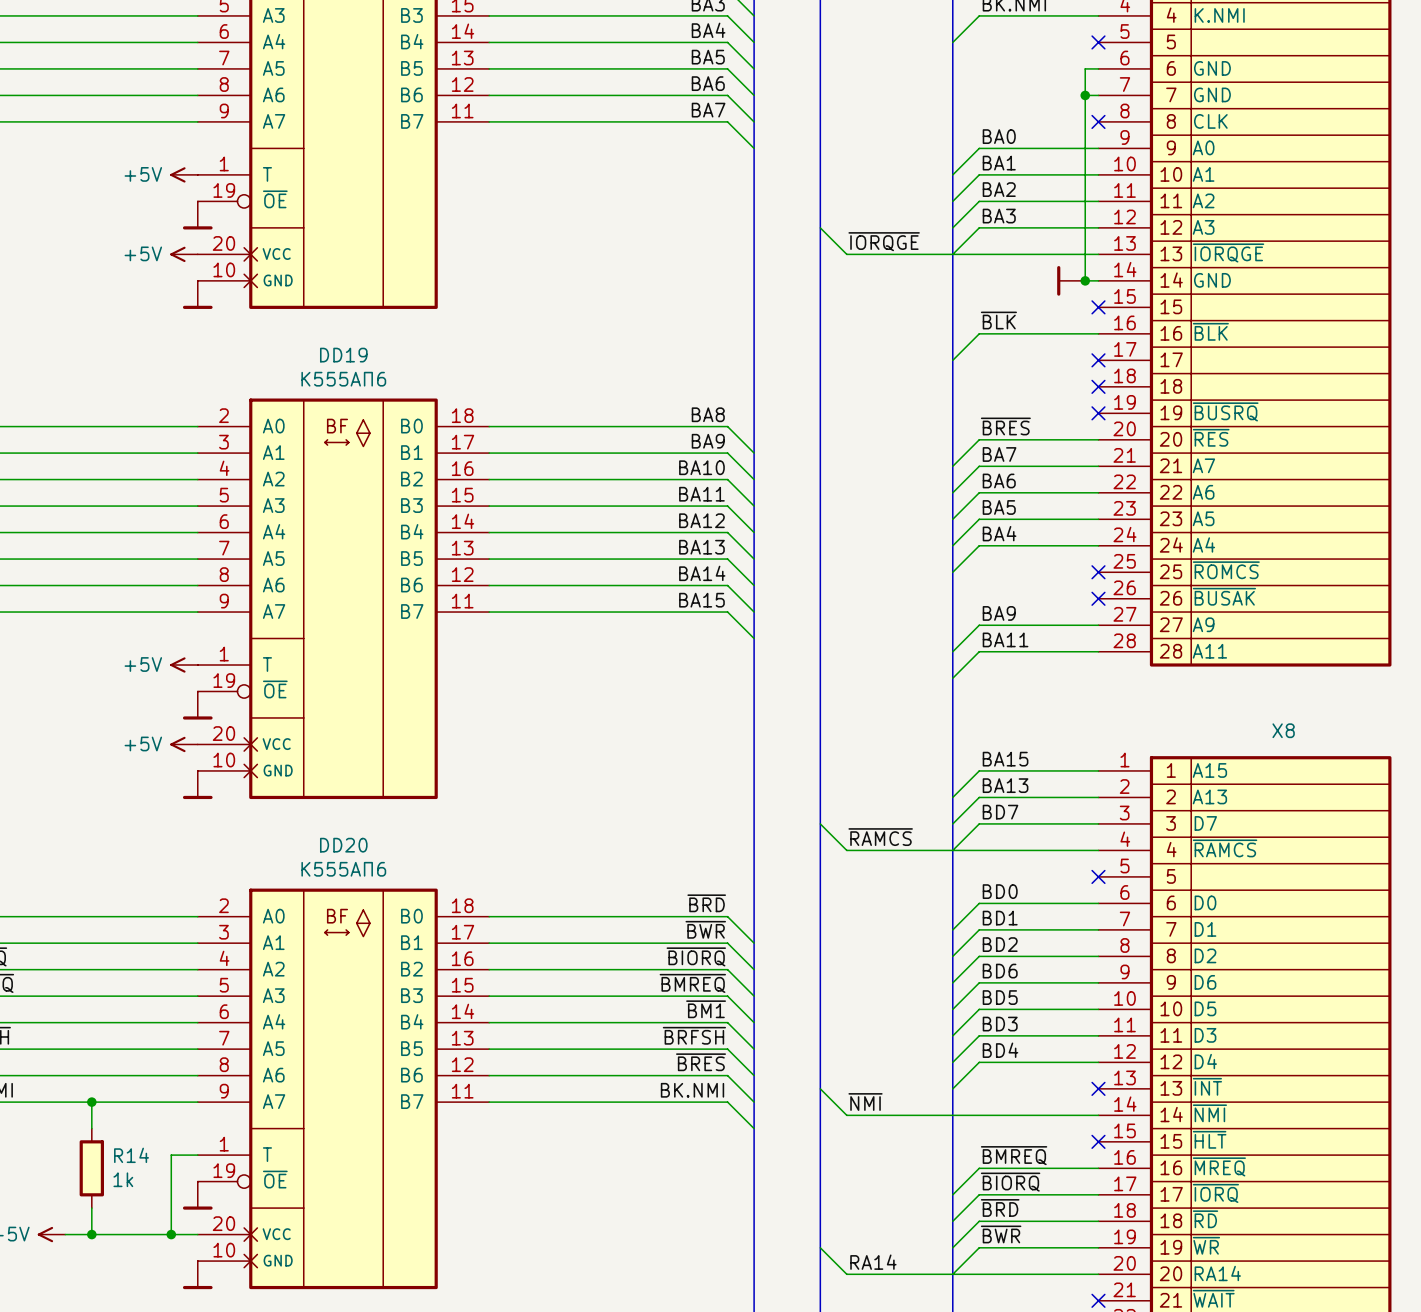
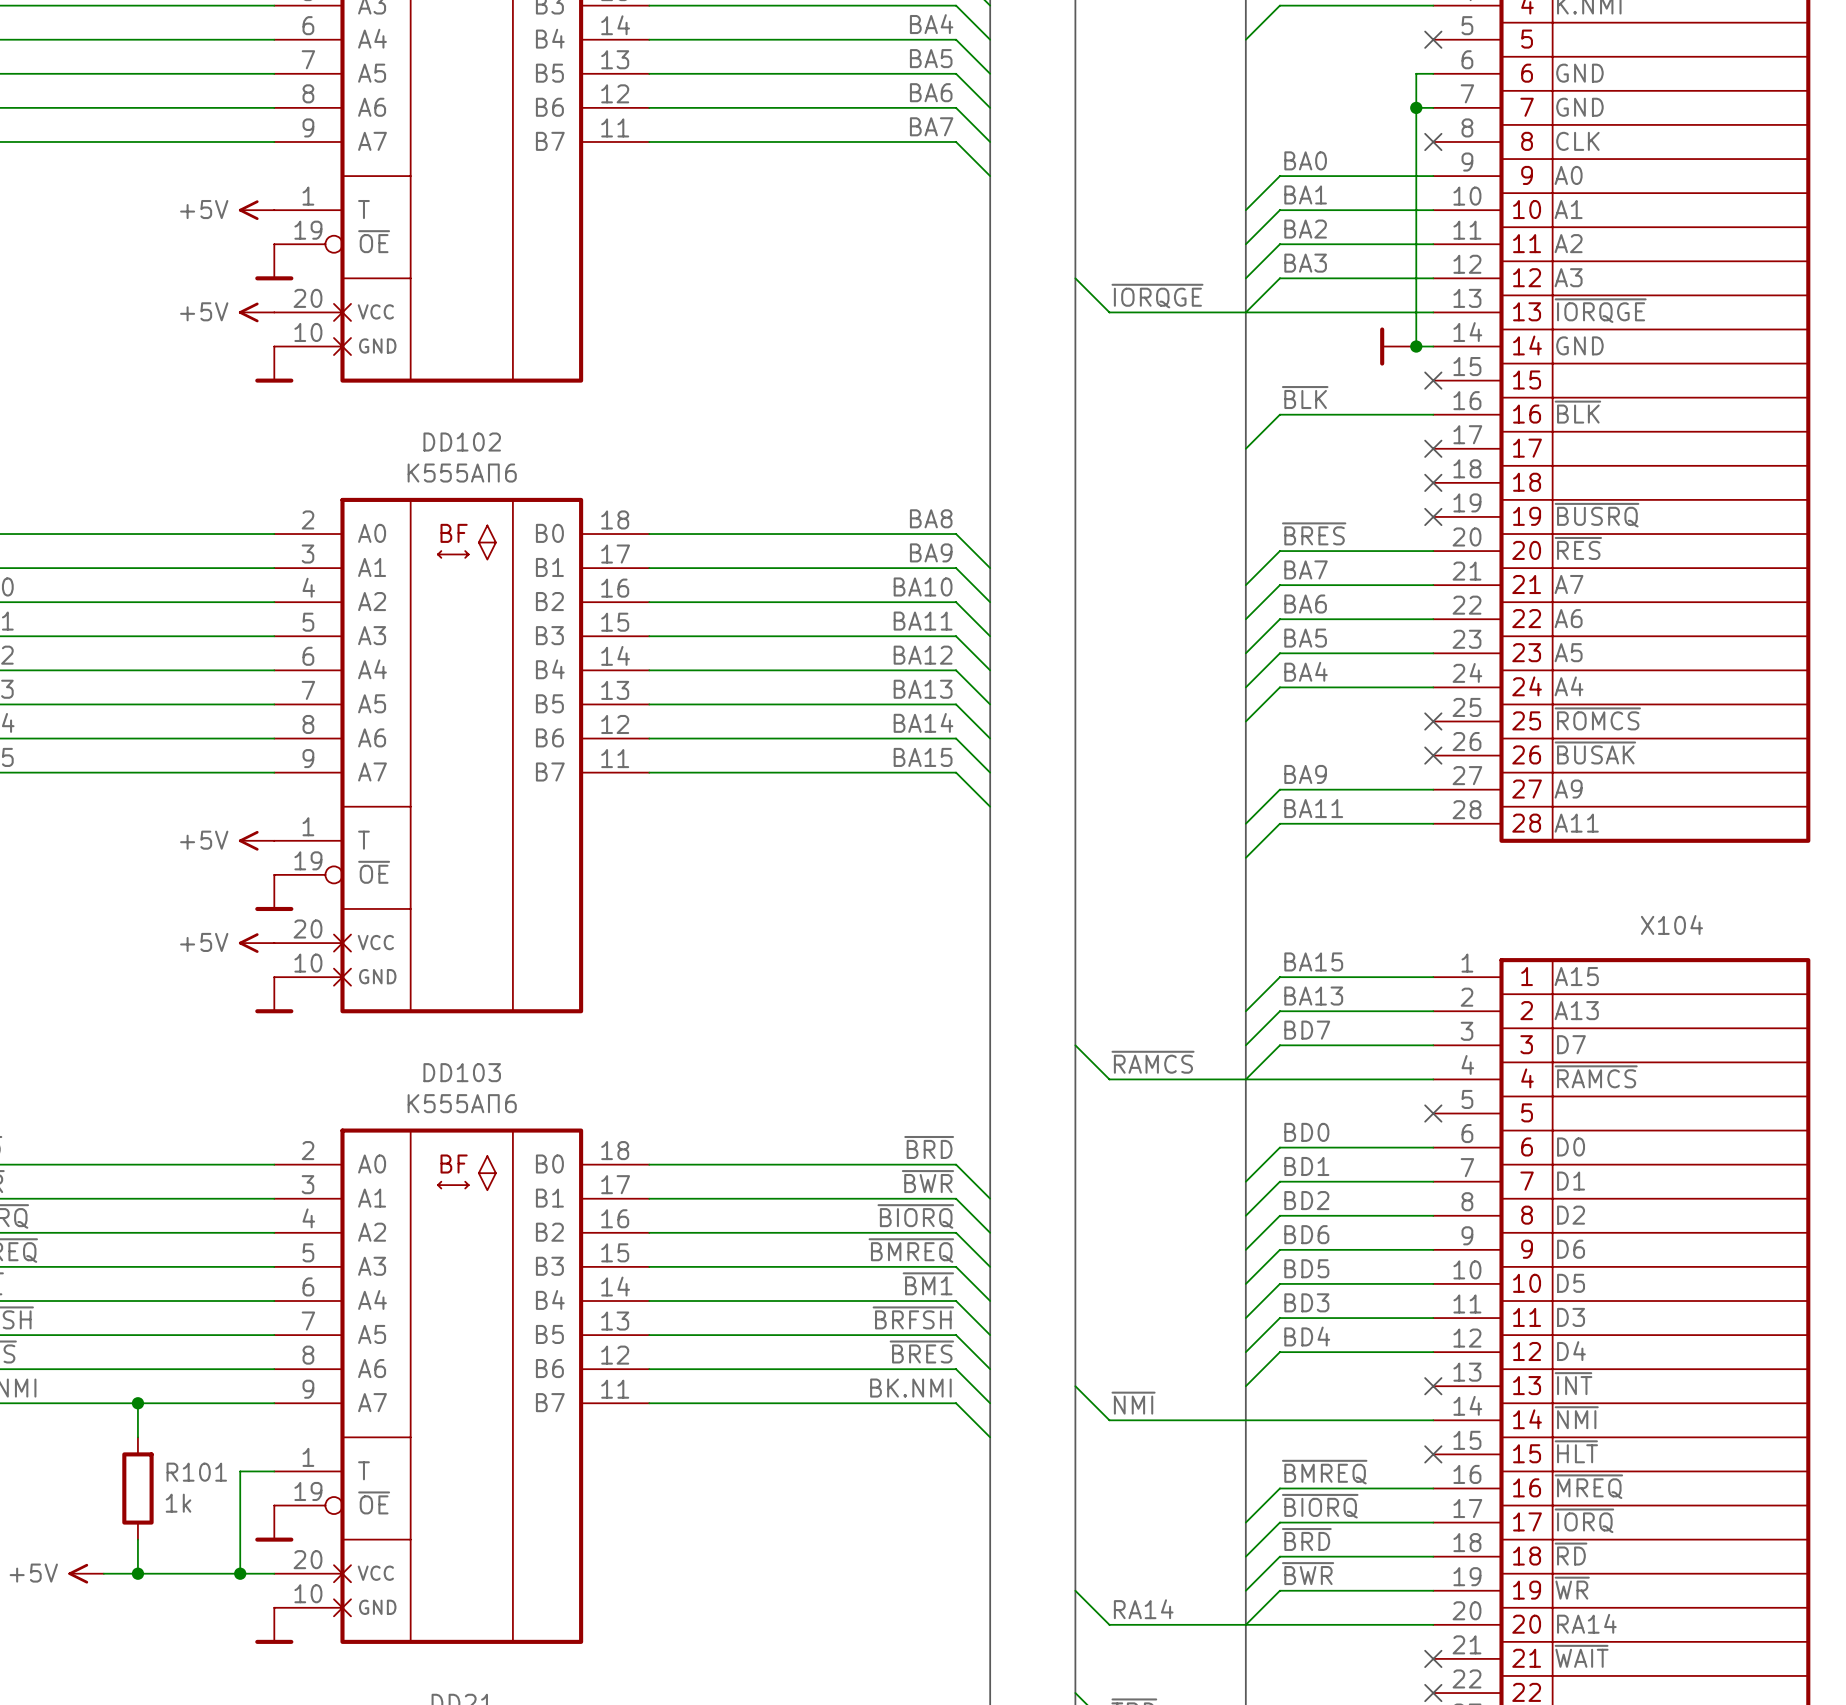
DD19 name: DD19 (343, 355) -> DD102 (462, 442)
X8 name: X8 (1283, 730) -> X104 (1671, 924)
DD20 name: DD20 (343, 845) -> DD103 (462, 1072)
R14 name: R14 (131, 1155) -> R101 (196, 1472)

